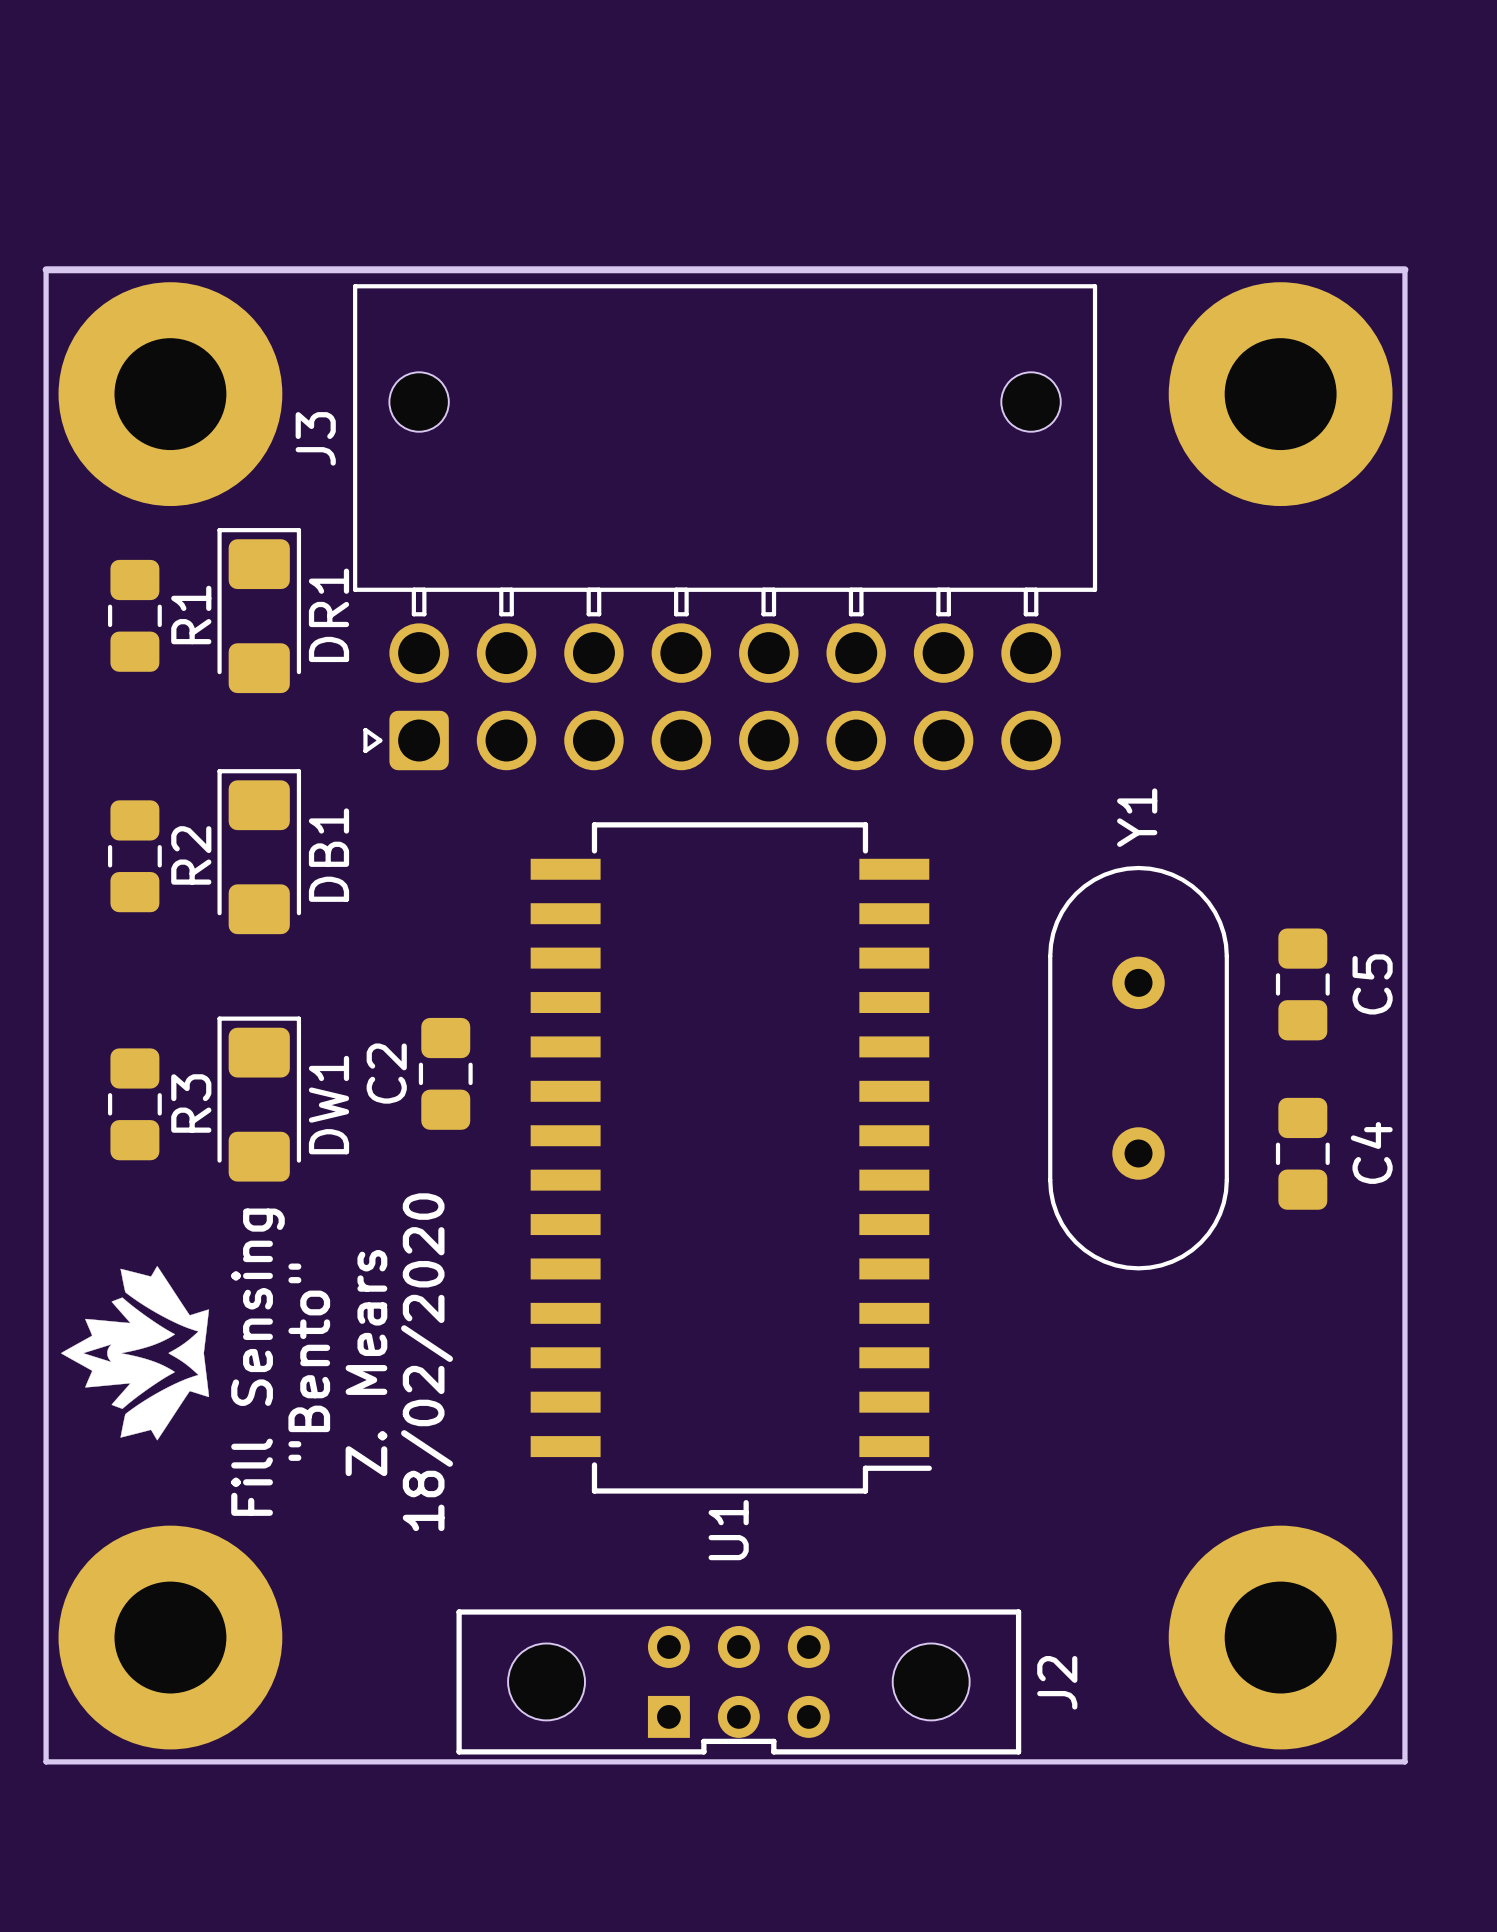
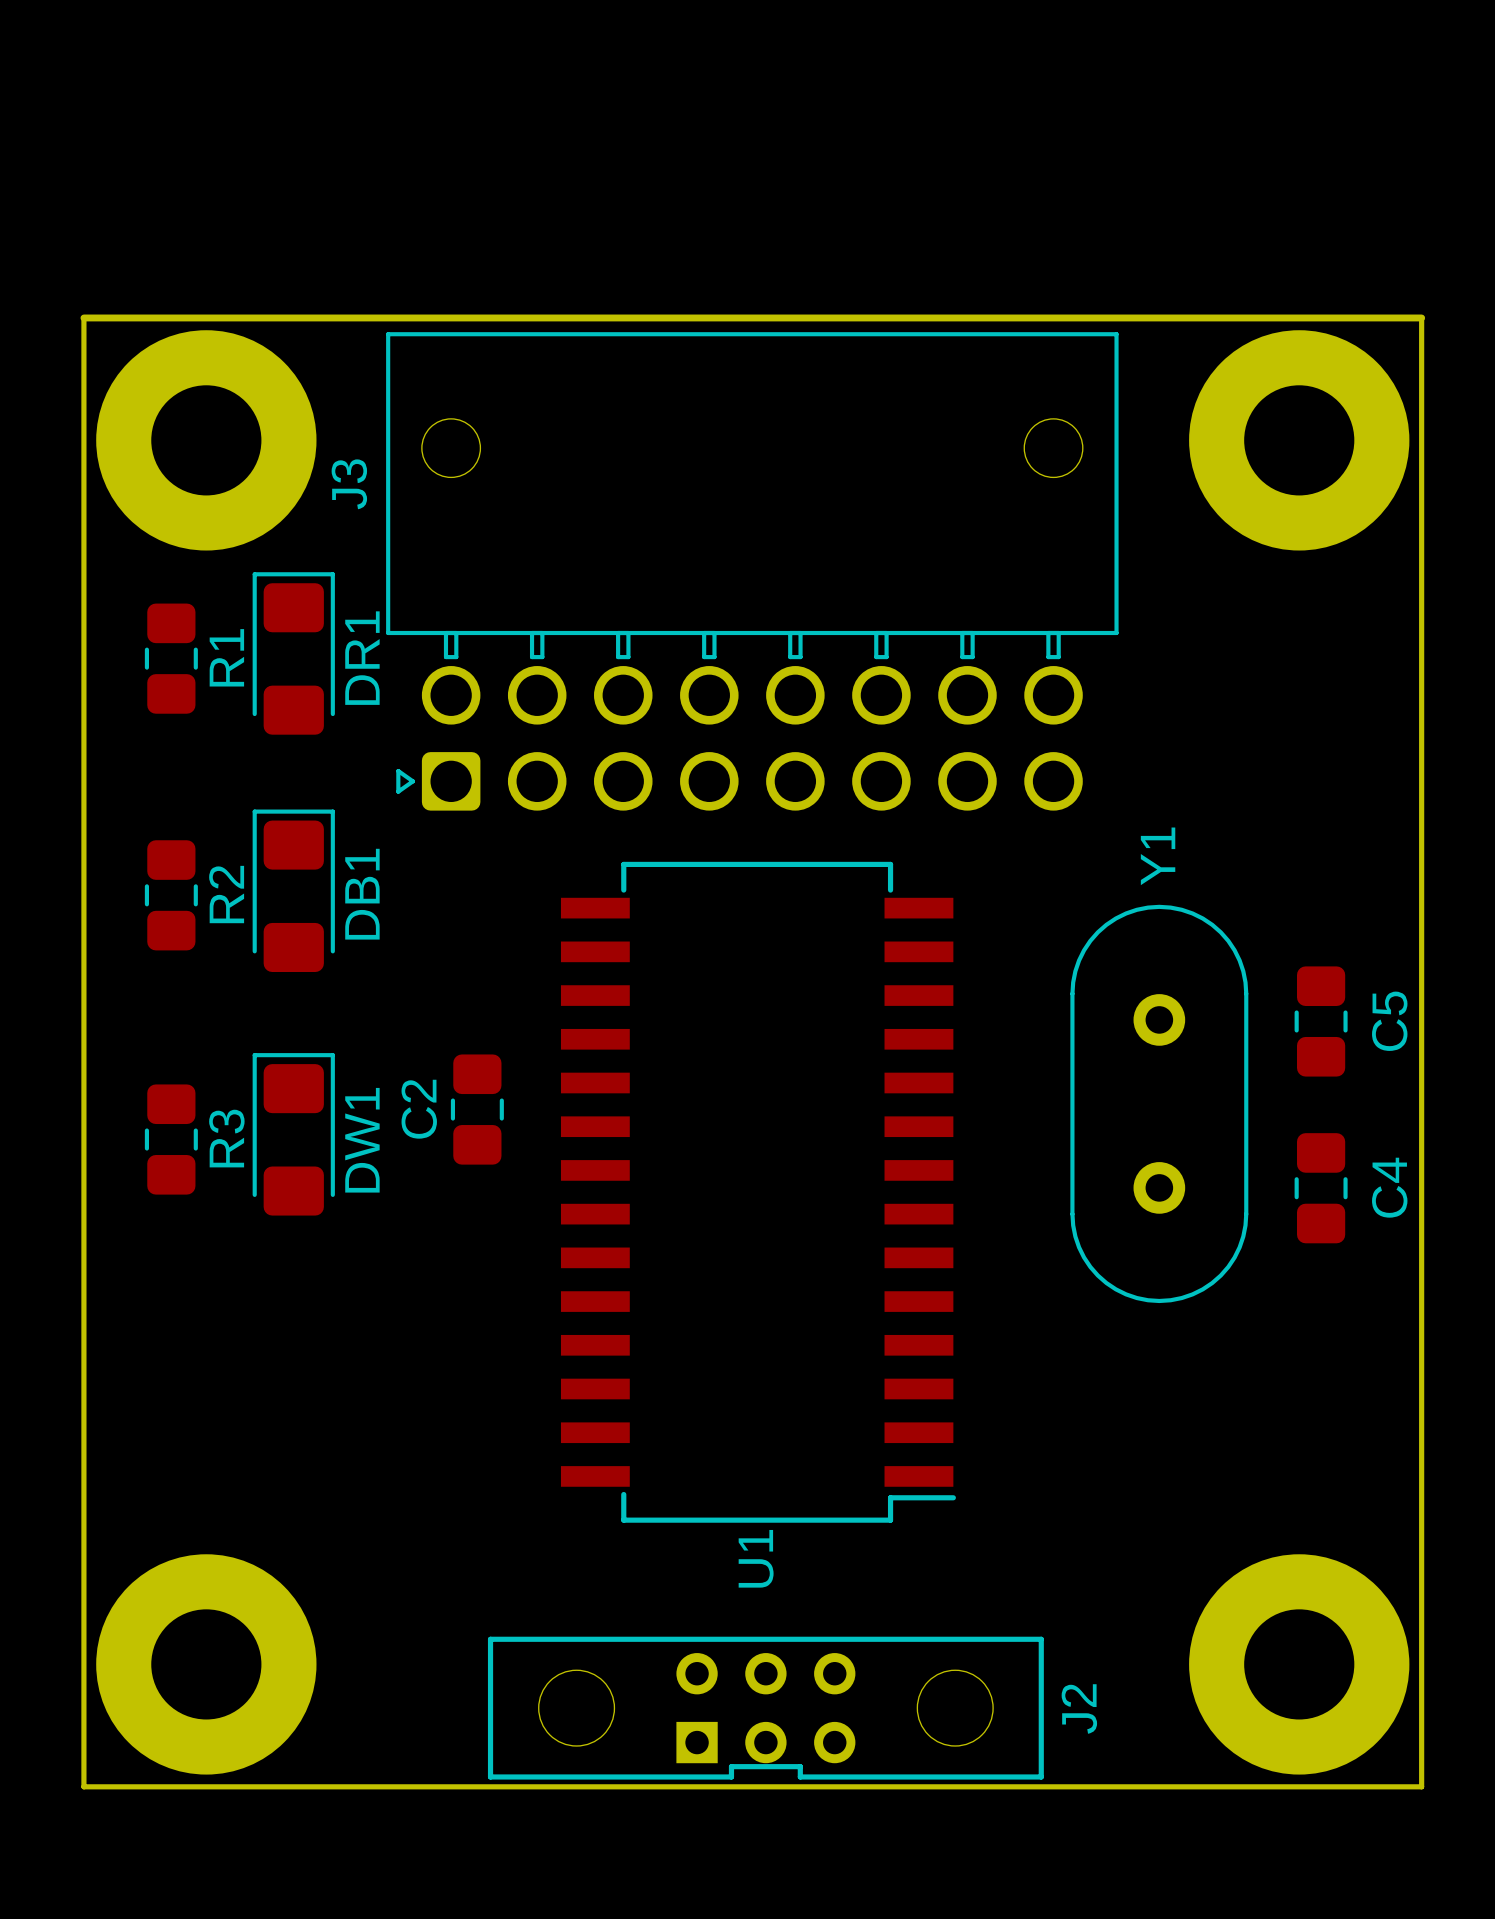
drawing: [61, 1266, 210, 1441] -> none
text: Fill Sensing (257, 1362) -> none
text: "Bento" (309, 1362) -> none
text: 18/02/2020 (427, 1362) -> none
text: Z. Mears (366, 1363) -> none

